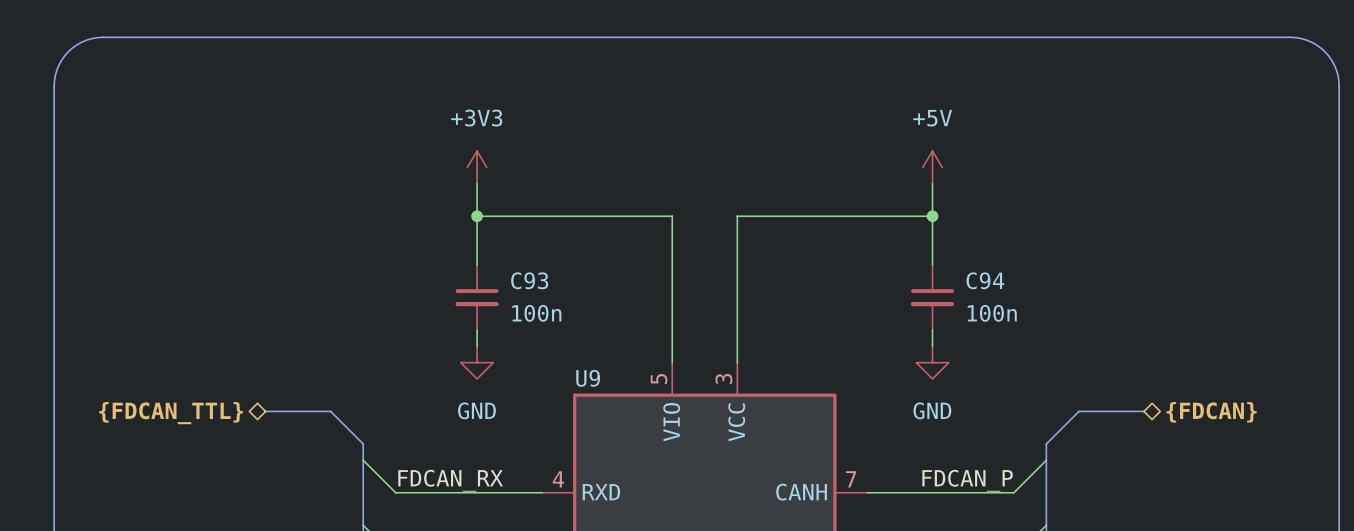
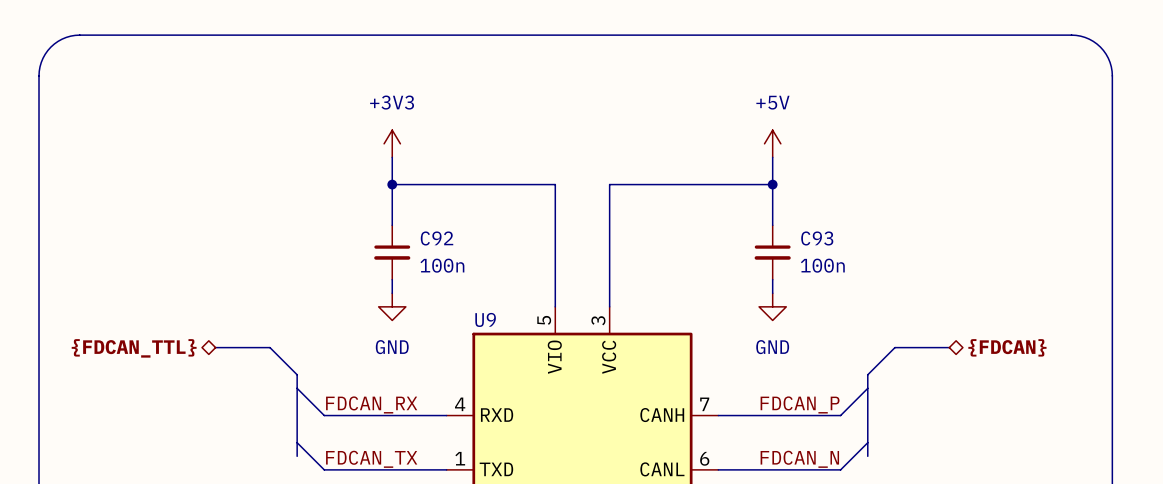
C93 name: C93 (529, 280) -> C92 (437, 238)
C94 name: C94 (985, 280) -> C93 (817, 238)

